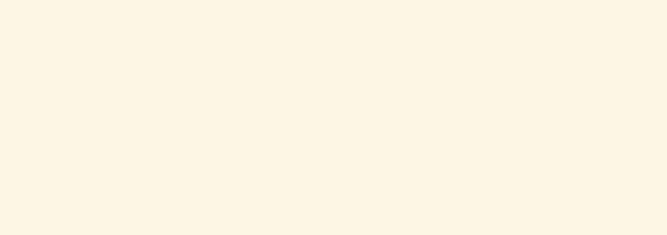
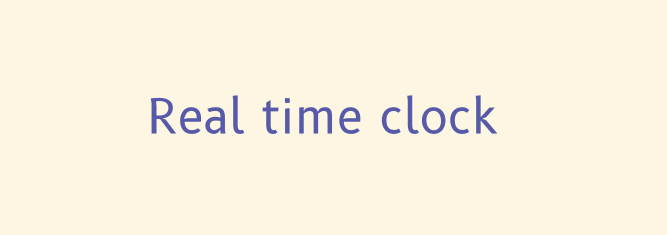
text: none -> Real time clock (324, 114)

